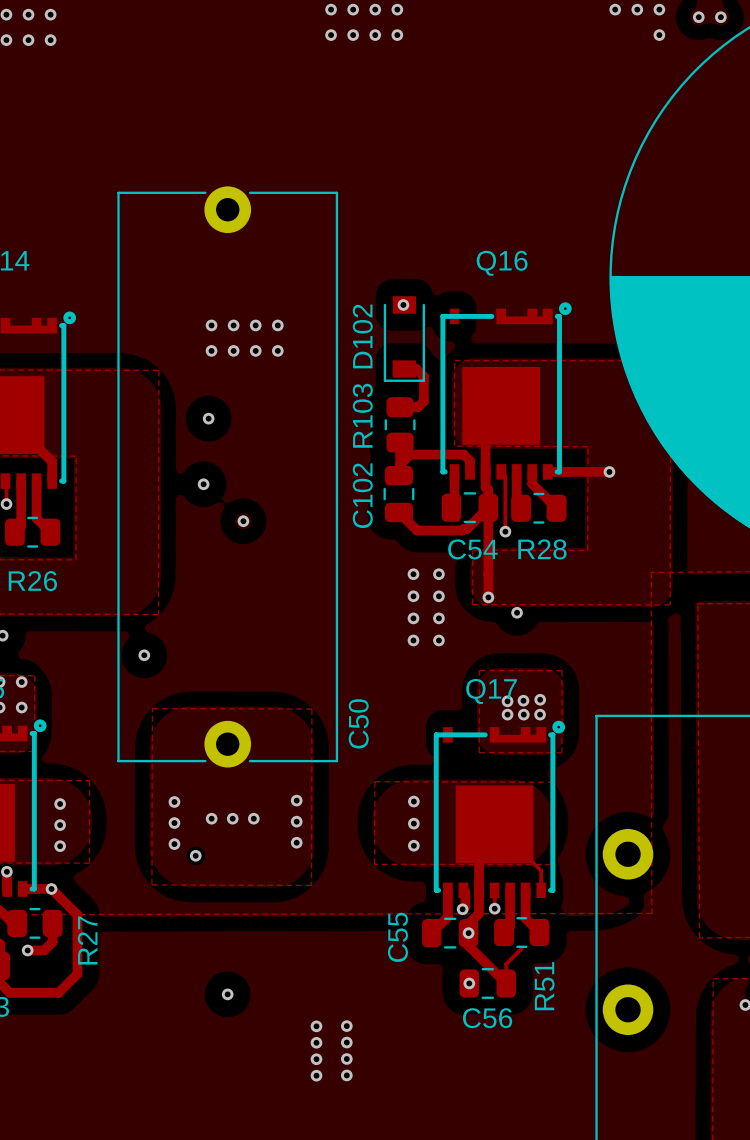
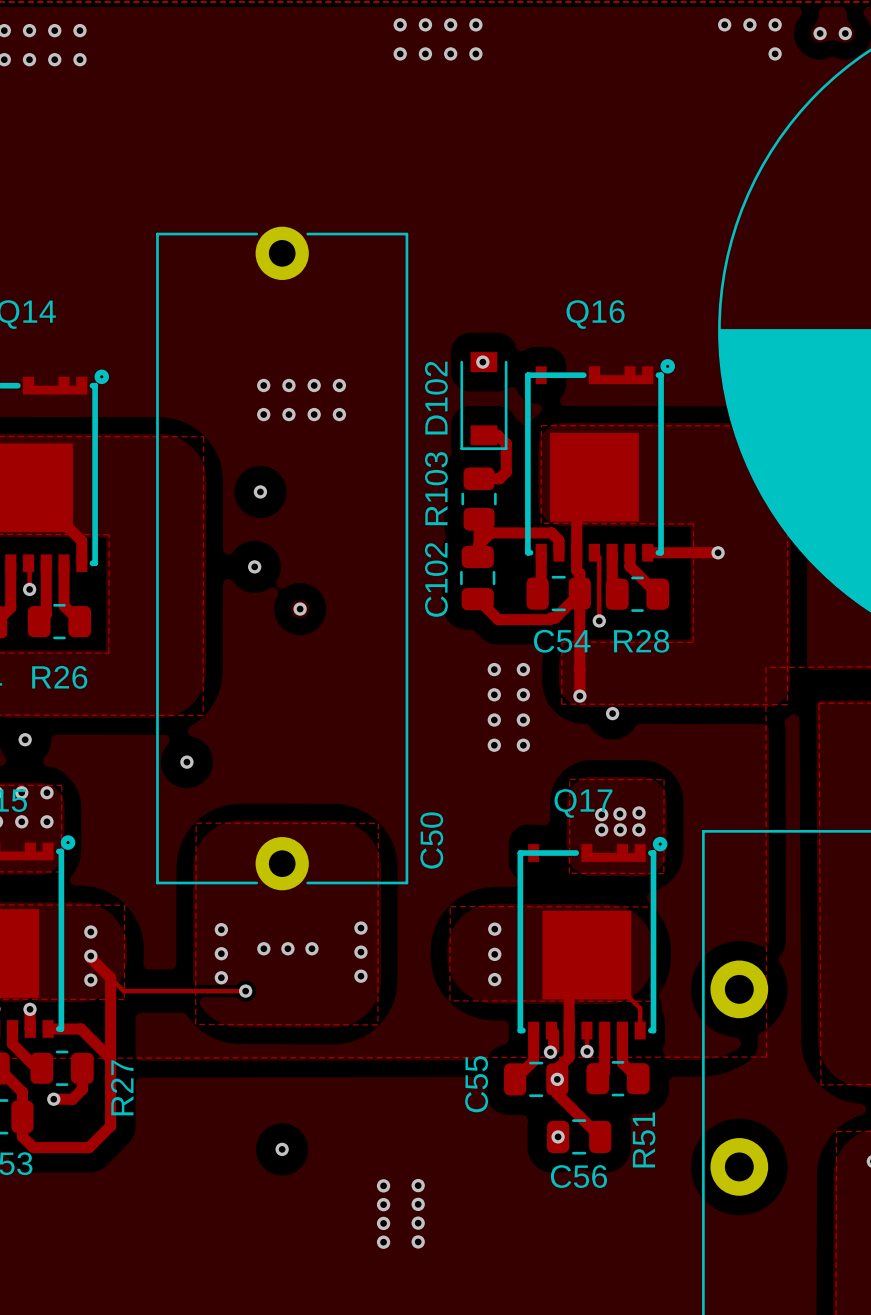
track: none -> (245, 991) (123, 991) (90, 958) (110, 978) (110, 1058)
via: (51, 888) -> none
track: (521, 948) (506, 964) (506, 983) -> none

